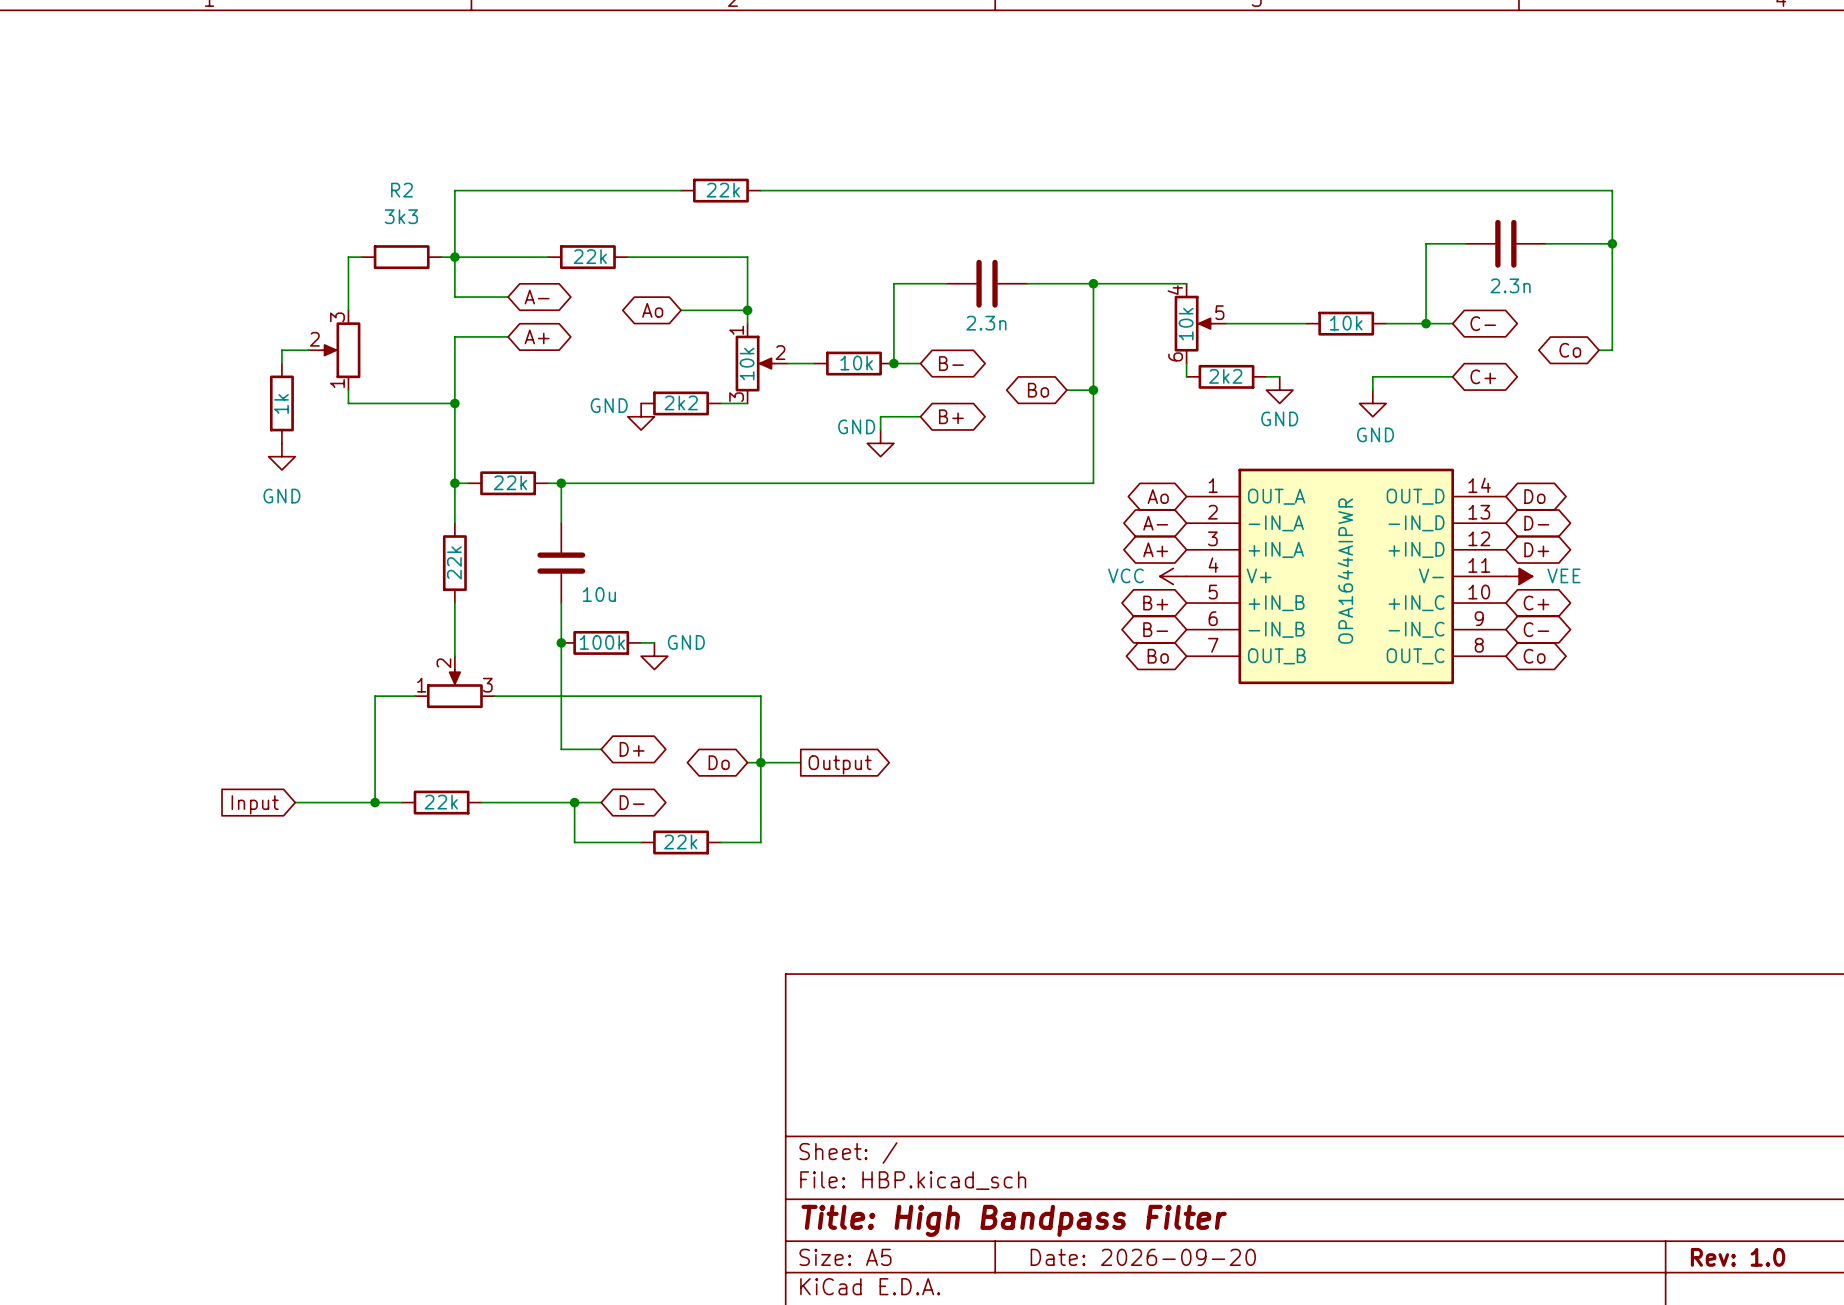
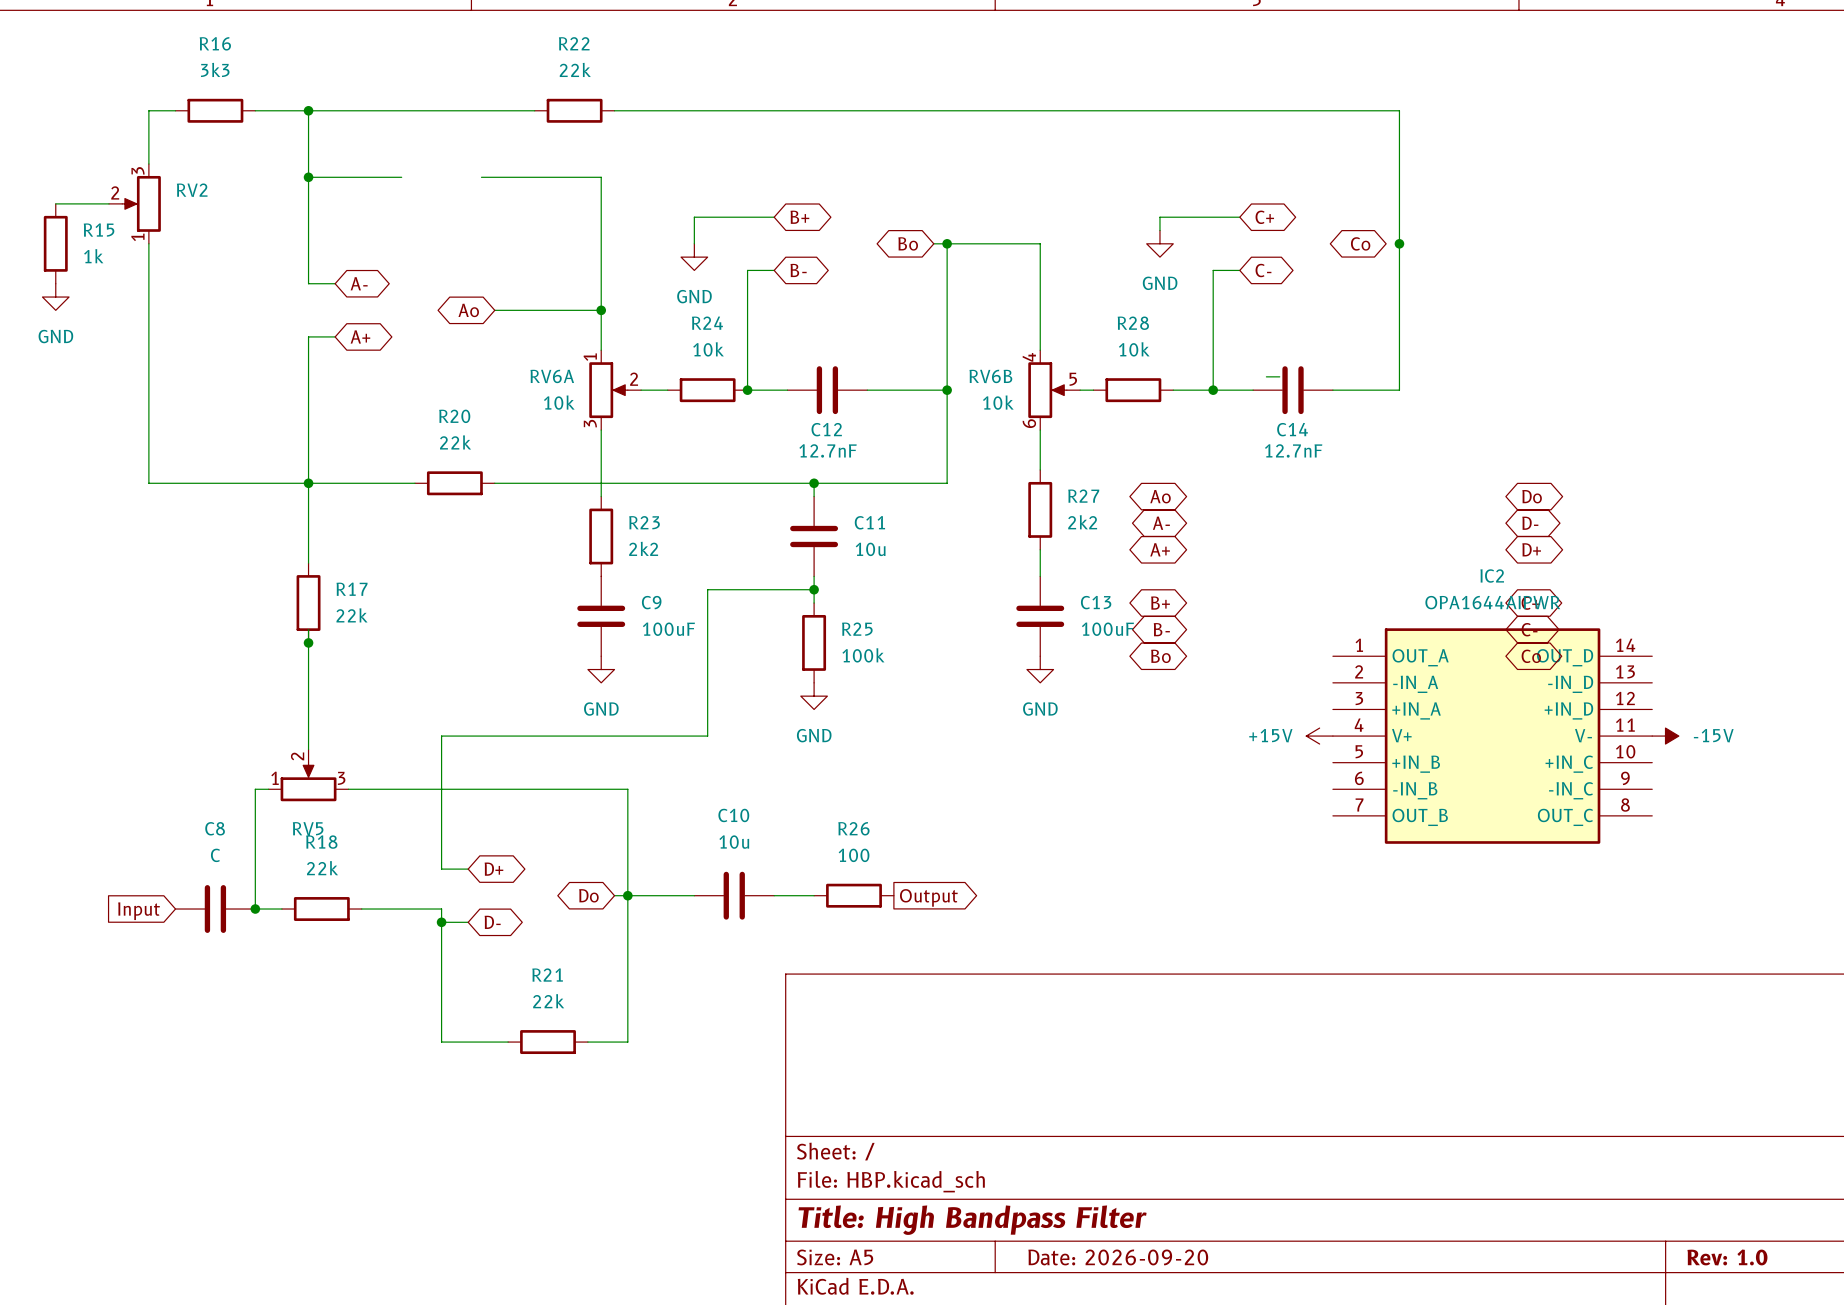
wire: none -> (175, 110) (148, 110) (148, 163)
R16: none -> 3k3 (215, 110)
wire: none -> (255, 110) (534, 110)
wire: none -> (308, 110) (308, 283) (335, 283)
junction: none -> (308, 110)
R22: none -> 22k (574, 110)
wire: none -> (614, 110) (1399, 110) (1399, 390) (1332, 390)
wire: none -> (308, 177) (401, 177)
junction: none -> (308, 177)
wire: none -> (481, 177) (601, 177) (601, 350)
wire: (681, 190) (454, 190) (454, 297) (508, 297) -> none
part: 22k (720, 190) -> none
wire: (760, 190) (1612, 190) (1612, 350) (1599, 350) -> none
wire: none -> (55, 203) (108, 203)
RV2: none -> (134, 203)
wire: none -> (774, 217) (694, 217) (694, 243)
wire: none -> (1239, 217) (1159, 217) (1159, 230)
global label: none -> C+ (1264, 217)
R15: none -> 1k (55, 243)
wire: none -> (148, 243) (148, 483) (414, 483)
wire: none -> (933, 243) (1040, 243) (1040, 350)
junction: none -> (947, 243)
power symbol: none -> GND (1159, 243)
junction: none -> (1399, 243)
wire: (1465, 243) (1426, 243) (1426, 323) -> none
part: 2.3n (1505, 243) -> none
wire: (1545, 243) (1612, 243) -> none
junction: (1612, 243) -> none
wire: (361, 257) (348, 257) (348, 310) -> none
R2: 3k3 (401, 257) -> none
wire: (441, 257) (548, 257) -> (494, 310) (601, 310)
junction: (454, 257) -> none
part: 22k (587, 257) -> none
wire: (627, 257) (747, 257) (747, 270) -> (774, 270) (747, 270)
power symbol: none -> GND (694, 257)
wire: none -> (1239, 270) (1213, 270) (1213, 390)
wire: (947, 283) (893, 283) (893, 363) (920, 363) -> none
part: 2.3n (987, 283) -> none
wire: (1026, 283) (1186, 283) -> none
wire: (1093, 283) (1093, 483) (947, 483) -> (947, 243) (947, 483)
junction: (1093, 283) -> none
power symbol: none -> GND (55, 297)
global label position: A- (537, 297) -> A- (359, 283)
junction: none -> (601, 310)
global label position: Ao (652, 310) -> Ao (468, 310)
wire: (681, 310) (747, 310) -> none
junction: (747, 310) -> none
wire: none -> (747, 323) (747, 390) (787, 390)
part: 10k (1200, 323) -> none
wire: (1226, 323) (1306, 323) -> (1173, 390) (1253, 390)
part: 10k (1346, 323) -> none
wire: (1386, 323) (1452, 323) -> none
junction: (1426, 323) -> none
global label position: C- (1483, 323) -> C- (1263, 270)
wire: none -> (335, 336) (308, 336) (308, 563)
wire: (508, 336) (454, 336) (454, 523) -> none
global label position: A+ (537, 336) -> A+ (360, 336)
wire: (308, 350) (281, 350) (281, 363) -> none
part: (334, 350) -> none
global label position: Co (1570, 350) -> Co (1360, 243)
part: 10k (761, 363) -> none
wire: (787, 363) (814, 363) -> none
part: 10k (853, 363) -> none
junction position: (893, 363) -> (947, 390)
global label position: B- (951, 363) -> B- (798, 270)
wire: (1186, 363) (1186, 376) -> none
part: 2k2 (1226, 376) -> none
wire: (1452, 376) (1372, 376) (1372, 390) -> none
global label: C+ (1483, 376) -> none
wire: (348, 390) (348, 403) (454, 403) -> none
RV6A: none -> 10k (615, 390)
R24: none -> 10k (707, 390)
junction: none -> (747, 390)
C12: none -> 12.7nF (827, 390)
wire: none -> (867, 390) (947, 390)
global label position: Bo (1038, 390) -> Bo (908, 243)
RV6B: none -> 10k (1054, 390)
junction: (1093, 390) -> none
R28: none -> 10k (1133, 390)
junction: none -> (1213, 390)
power symbol: GND (1279, 390) -> none
C14: none -> 12.7nF (1293, 390)
part: 1k (281, 403) -> none
junction: (454, 403) -> none
part: 2k2 (681, 403) -> none
wire: (720, 403) (747, 403) -> (641, 390) (667, 390)
power symbol: GND (1372, 403) -> none
power symbol: GND (641, 416) -> none
wire: (920, 416) (880, 416) (880, 430) -> none
global label position: B+ (951, 416) -> B+ (799, 217)
wire: none -> (601, 430) (601, 496)
wire: none -> (1040, 430) (1040, 469)
power symbol: GND (880, 443) -> none
power symbol: GND (281, 456) -> none
junction: none -> (308, 483)
wire: (454, 483) (468, 483) -> none
junction: (454, 483) -> none
R20: none -> 22k (454, 483)
wire: none -> (494, 483) (548, 483)
part: 22k (508, 483) -> none
wire: (561, 483) (561, 523) -> none
junction: (561, 483) -> none
wire: none -> (814, 483) (814, 496)
junction: none -> (814, 483)
R27: none -> 2k2 (1040, 509)
R23: none -> 2k2 (601, 536)
C11: none -> 10u (814, 536)
wire: none -> (1040, 549) (1040, 576)
part: 22k (454, 563) -> none
part: 10u (561, 563) -> none
wire: none -> (814, 576) (814, 603)
power symbol: VCC (1173, 576) -> none
part: OPA1644AIPWR (1346, 576) -> none
power symbol: VEE (1519, 576) -> none
wire: none -> (814, 589) (707, 589) (707, 736) (441, 736) (441, 869) (468, 869)
junction: none -> (814, 589)
R17: none -> 22k (308, 603)
wire: (454, 603) (454, 656) -> none
wire: (561, 603) (561, 749) (601, 749) -> none
C9: none -> 100uF (601, 616)
C13: none -> 100uF (1040, 616)
wire: none -> (308, 629) (308, 749)
junction: none -> (308, 642)
junction: (561, 642) -> none
part: 100k (601, 642) -> none
wire: (641, 642) (654, 642) -> none
power symbol text position: GND (686, 642) -> GND (601, 709)
R25: none -> 100k (814, 642)
power symbol position: GND (654, 656) -> GND (601, 669)
power symbol: none -> GND (1040, 669)
part: (454, 682) -> none
wire: (414, 696) (375, 696) (375, 802) -> none
wire: (494, 696) (760, 696) (760, 842) (720, 842) -> none
power symbol: none -> GND (814, 696)
power symbol: none -> +15V (1319, 736)
IC2: none -> OPA1644AIPWR (1492, 736)
power symbol: none -> -15V (1665, 736)
global label position: D+ (632, 749) -> D+ (493, 869)
global label position: Do (719, 762) -> Do (588, 895)
wire: (747, 762) (800, 762) -> none
junction: (760, 762) -> none
global label position: Output (840, 764) -> Output (928, 897)
RV5: none -> (308, 775)
wire: none -> (268, 789) (255, 789) (255, 909) (281, 909)
wire: none -> (348, 789) (627, 789) (627, 1042) (587, 1042)
wire: (295, 802) (401, 802) -> none
junction: (375, 802) -> none
part: 22k (441, 802) -> none
wire: (481, 802) (601, 802) -> none
wire: (574, 802) (574, 842) (641, 842) -> none
junction: (574, 802) -> none
global label position: D- (632, 802) -> D- (492, 922)
global label position: Input (255, 804) -> Input (139, 911)
part: 22k (681, 842) -> none
wire: none -> (614, 895) (694, 895)
junction: none -> (627, 895)
C10: none -> 10u (734, 895)
wire: none -> (774, 895) (814, 895)
R26: none -> 100 (853, 895)
C8: none -> C (215, 909)
junction: none -> (255, 909)
R18: none -> 22k (321, 909)
wire: none -> (361, 909) (441, 909) (441, 1042) (508, 1042)
wire: none -> (441, 922) (468, 922)
junction: none -> (441, 922)
R21: none -> 22k (548, 1042)

